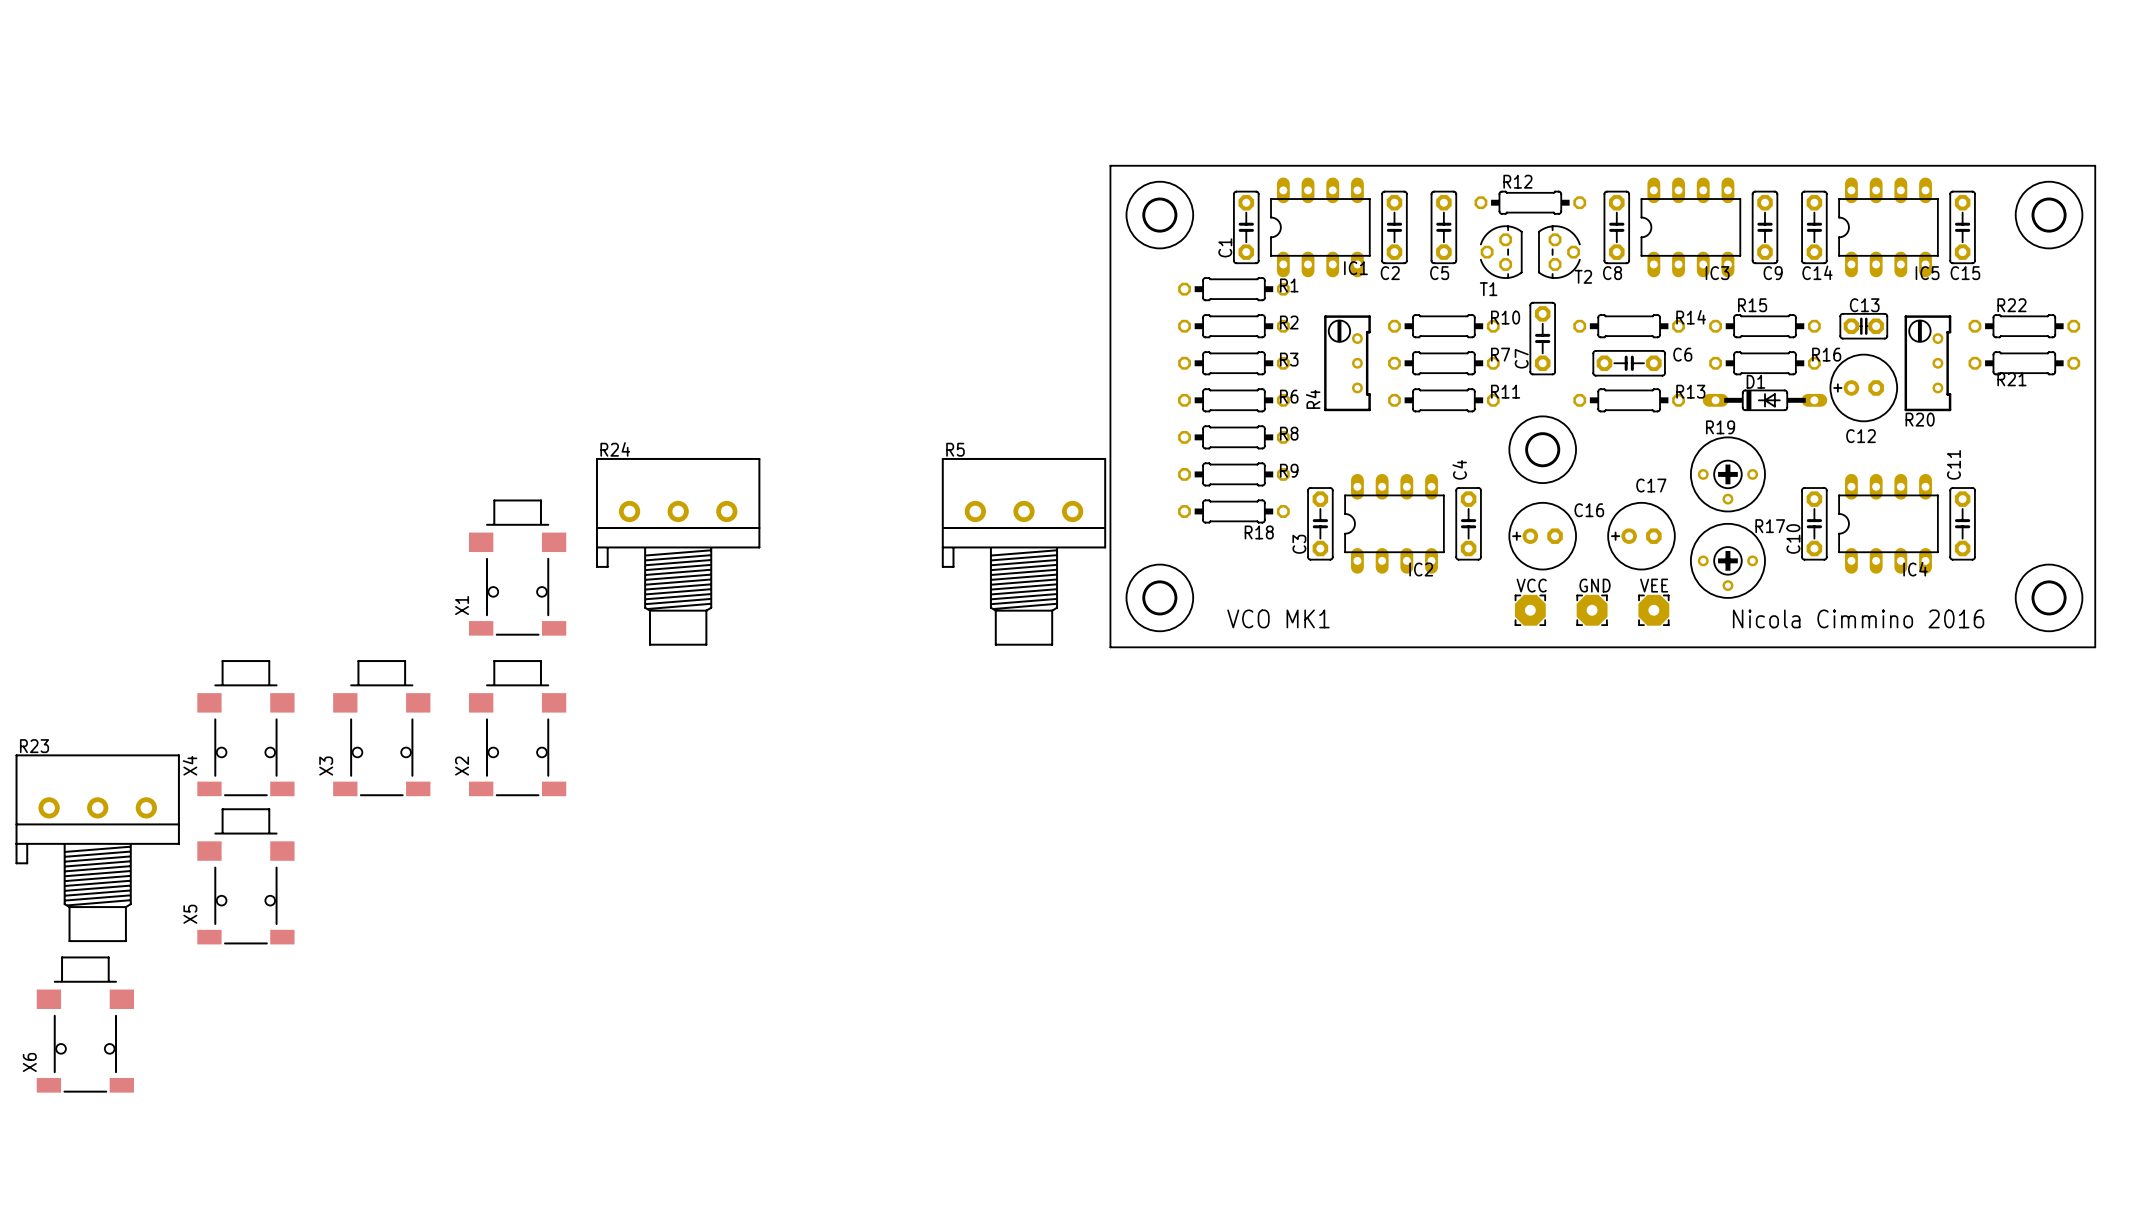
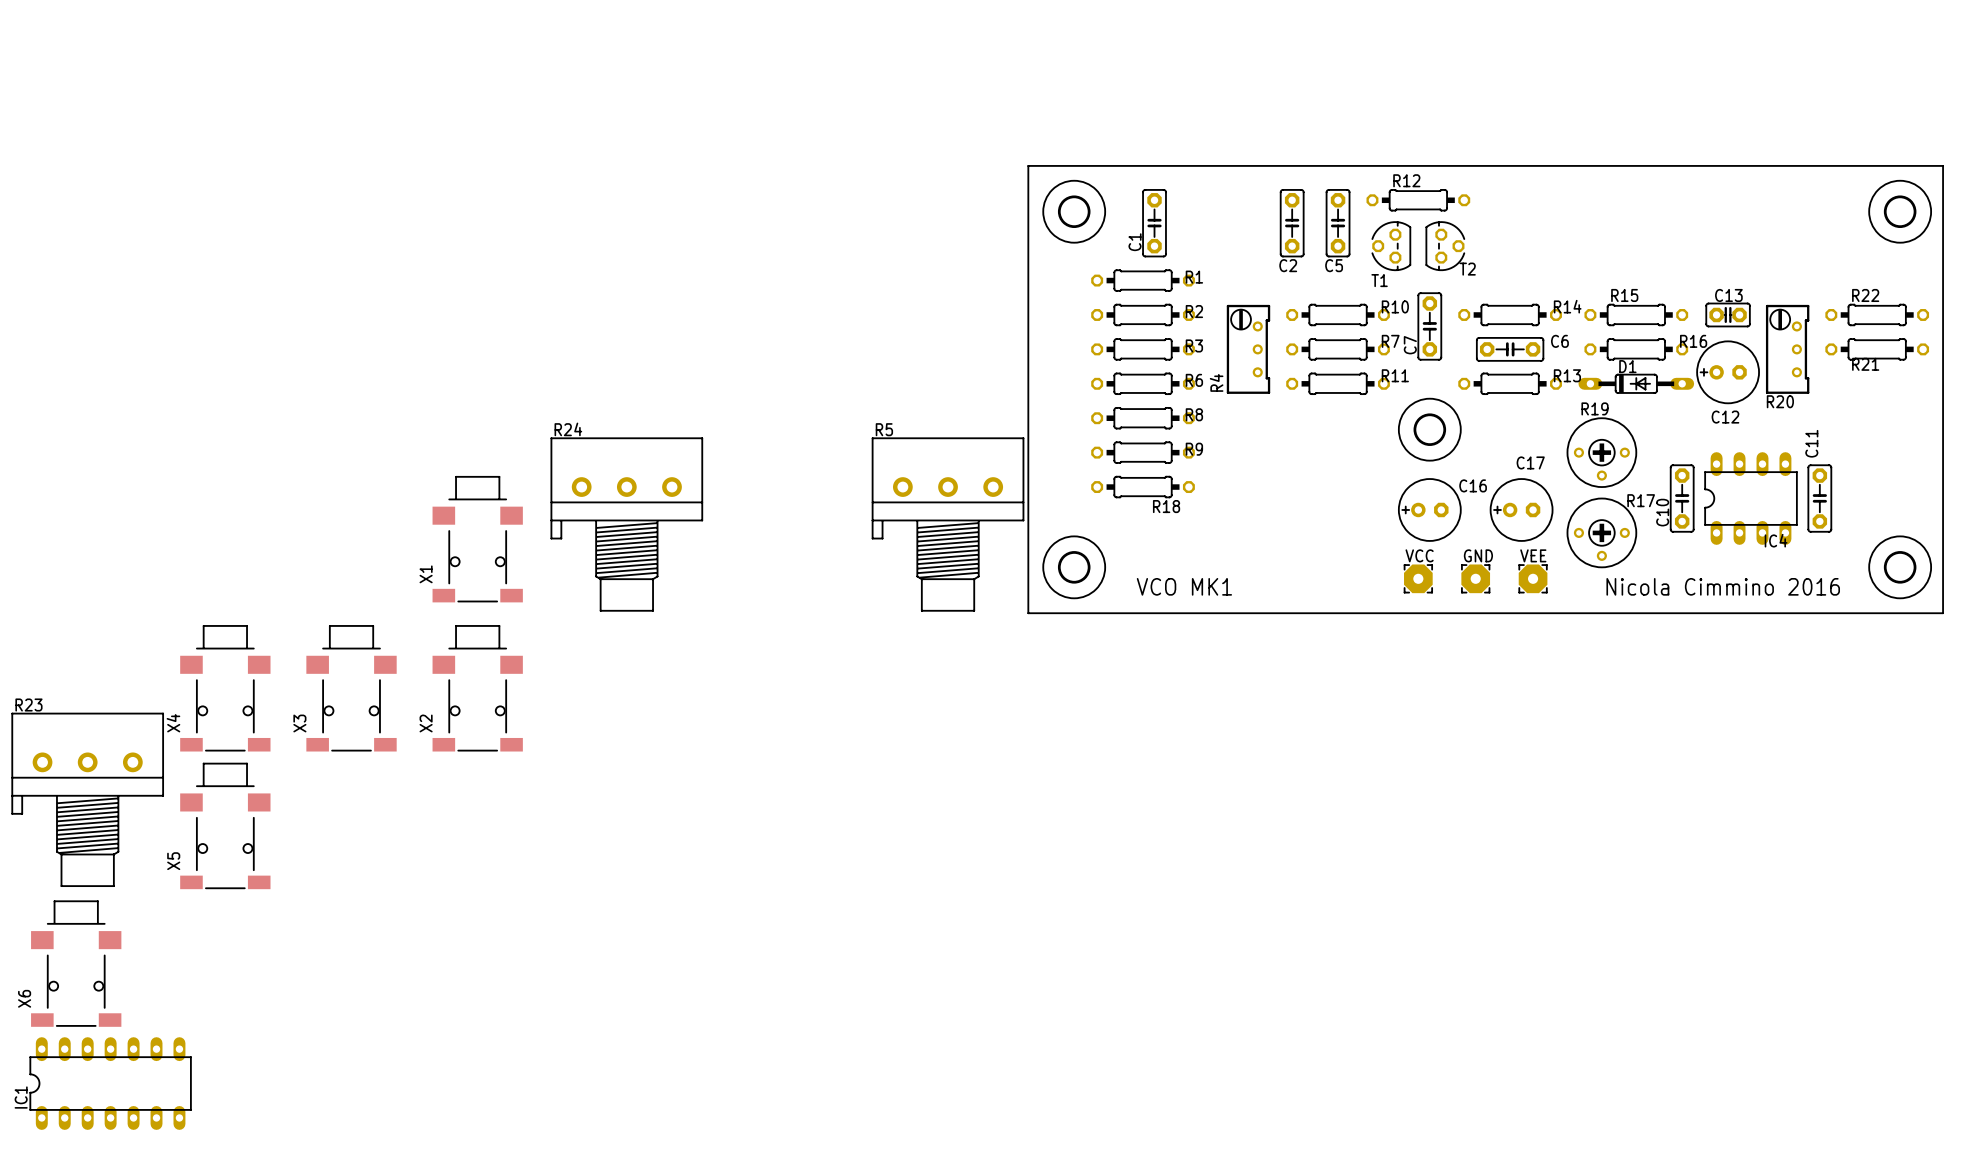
IC1 footprint: [1270, 177, 1371, 278] -> [29, 1037, 192, 1130]
C8: (1616, 227) -> none
IC3: (1690, 227) -> none
C9: (1765, 227) -> none
C14: (1814, 227) -> none
IC5: (1888, 227) -> none
C15: (1962, 227) -> none
IC1 name position: IC1 (1355, 268) -> IC1 (21, 1097)
C3: (1320, 523) -> none
IC2: (1394, 523) -> none
C4: (1468, 523) -> none

